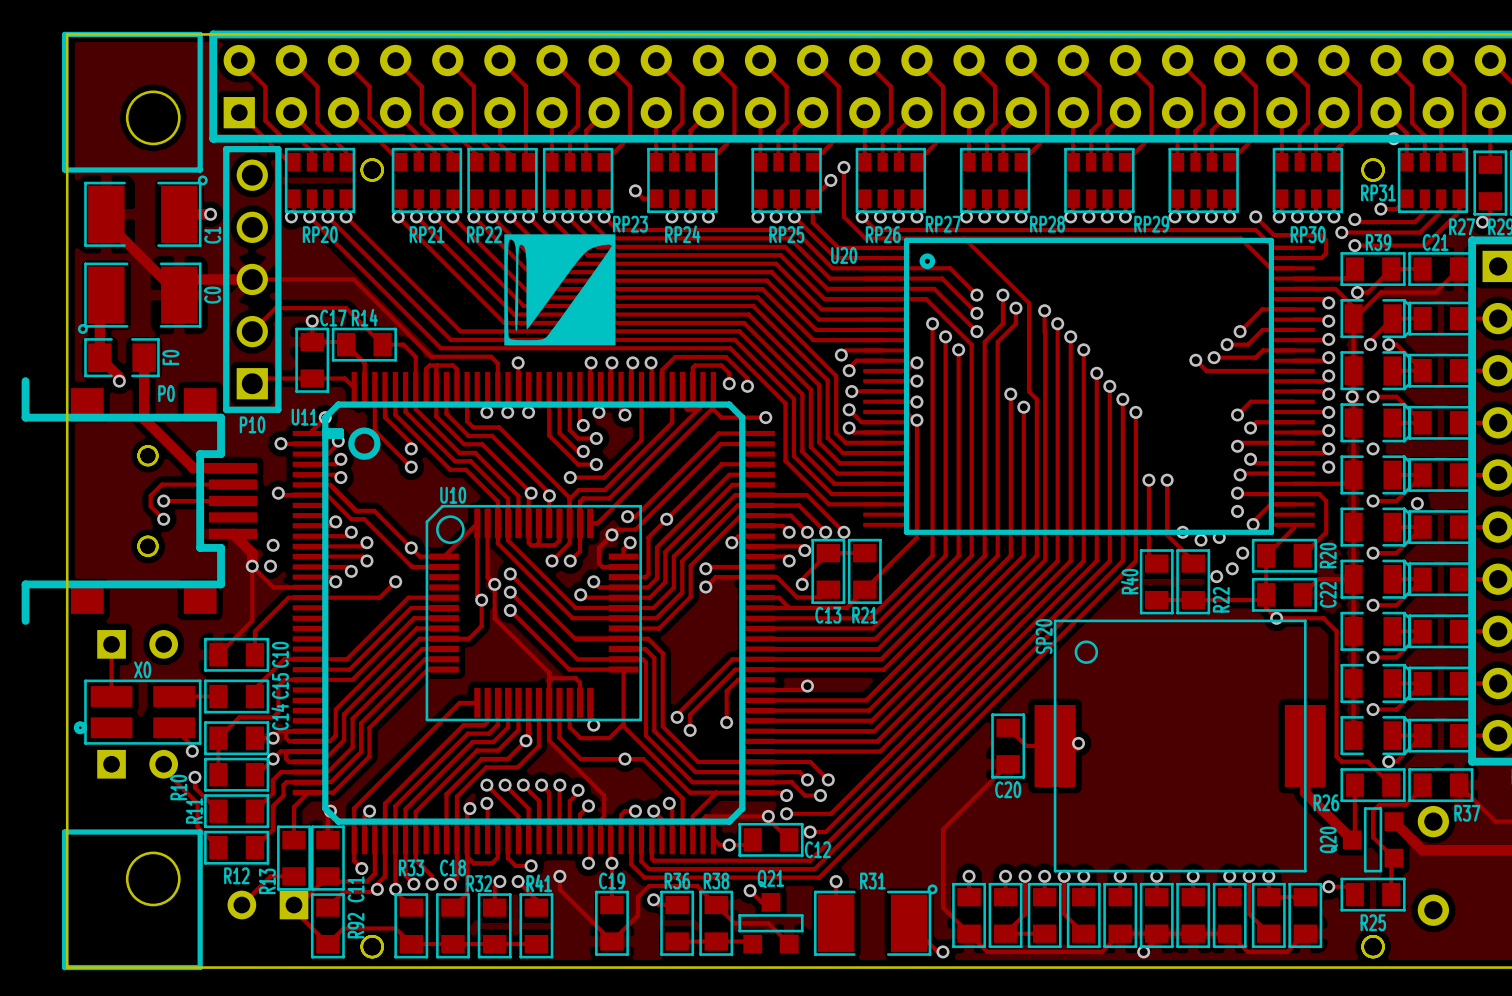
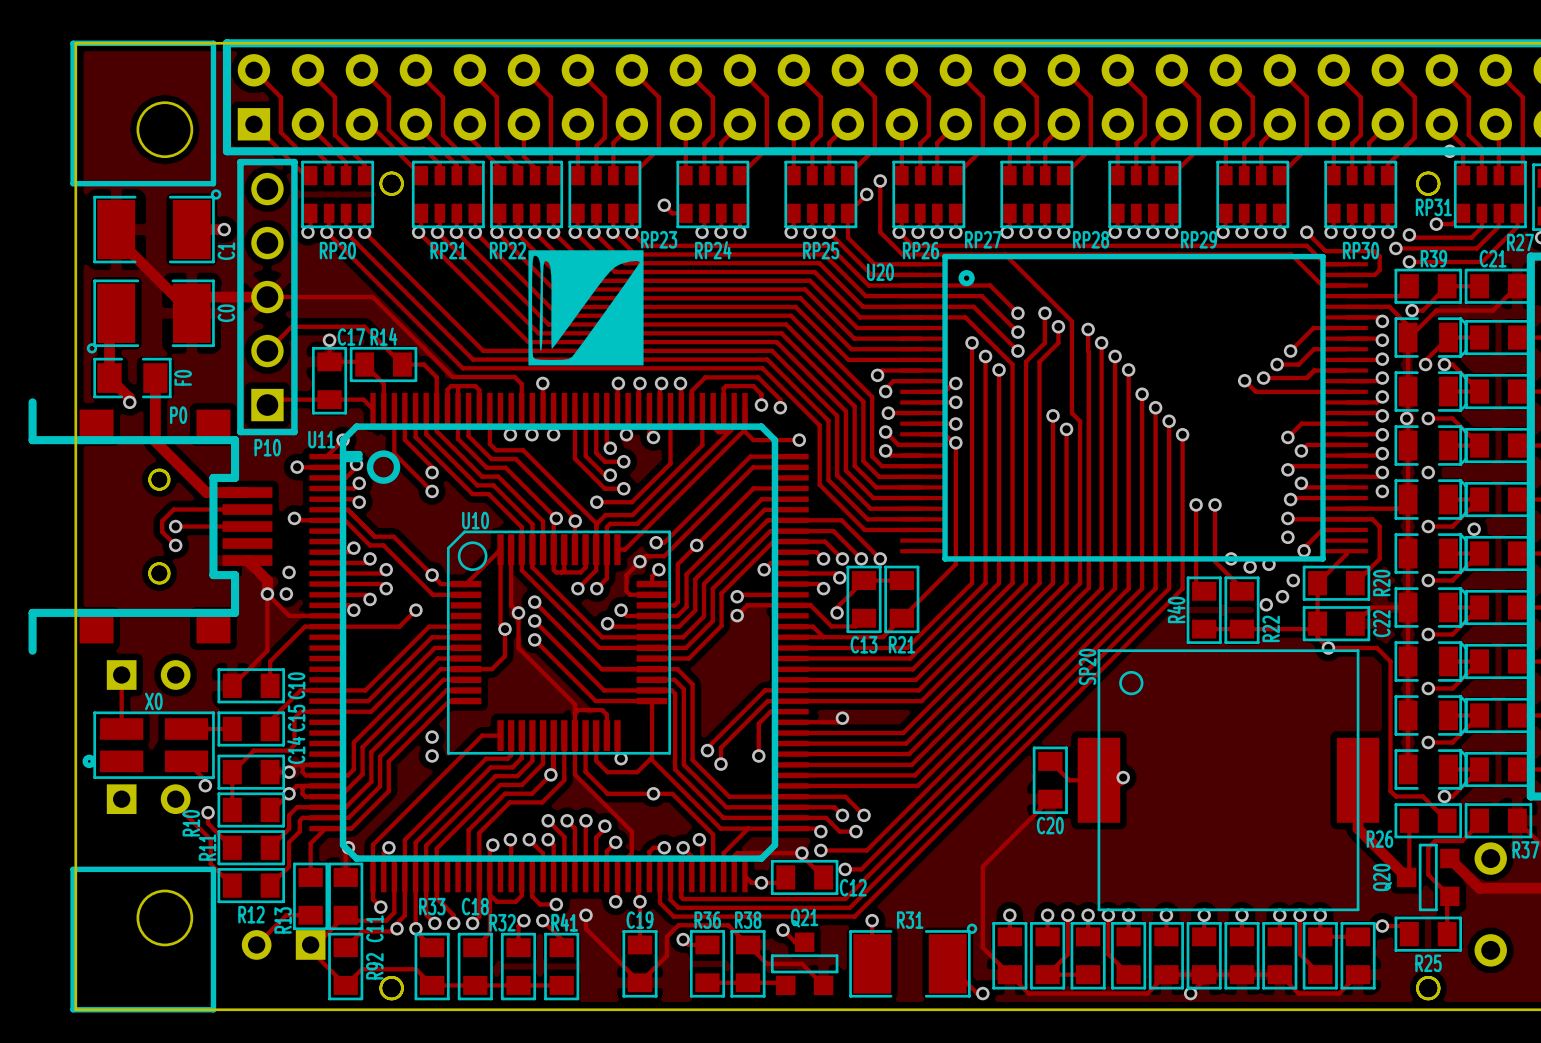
via: none -> (432, 737)
via: none -> (432, 755)
track: (486, 785) (505, 803) -> none
via: (486, 785) -> none
track: (505, 785) (523, 803) -> none
via: (505, 785) -> none
via: none -> (529, 839)
via: none -> (548, 839)

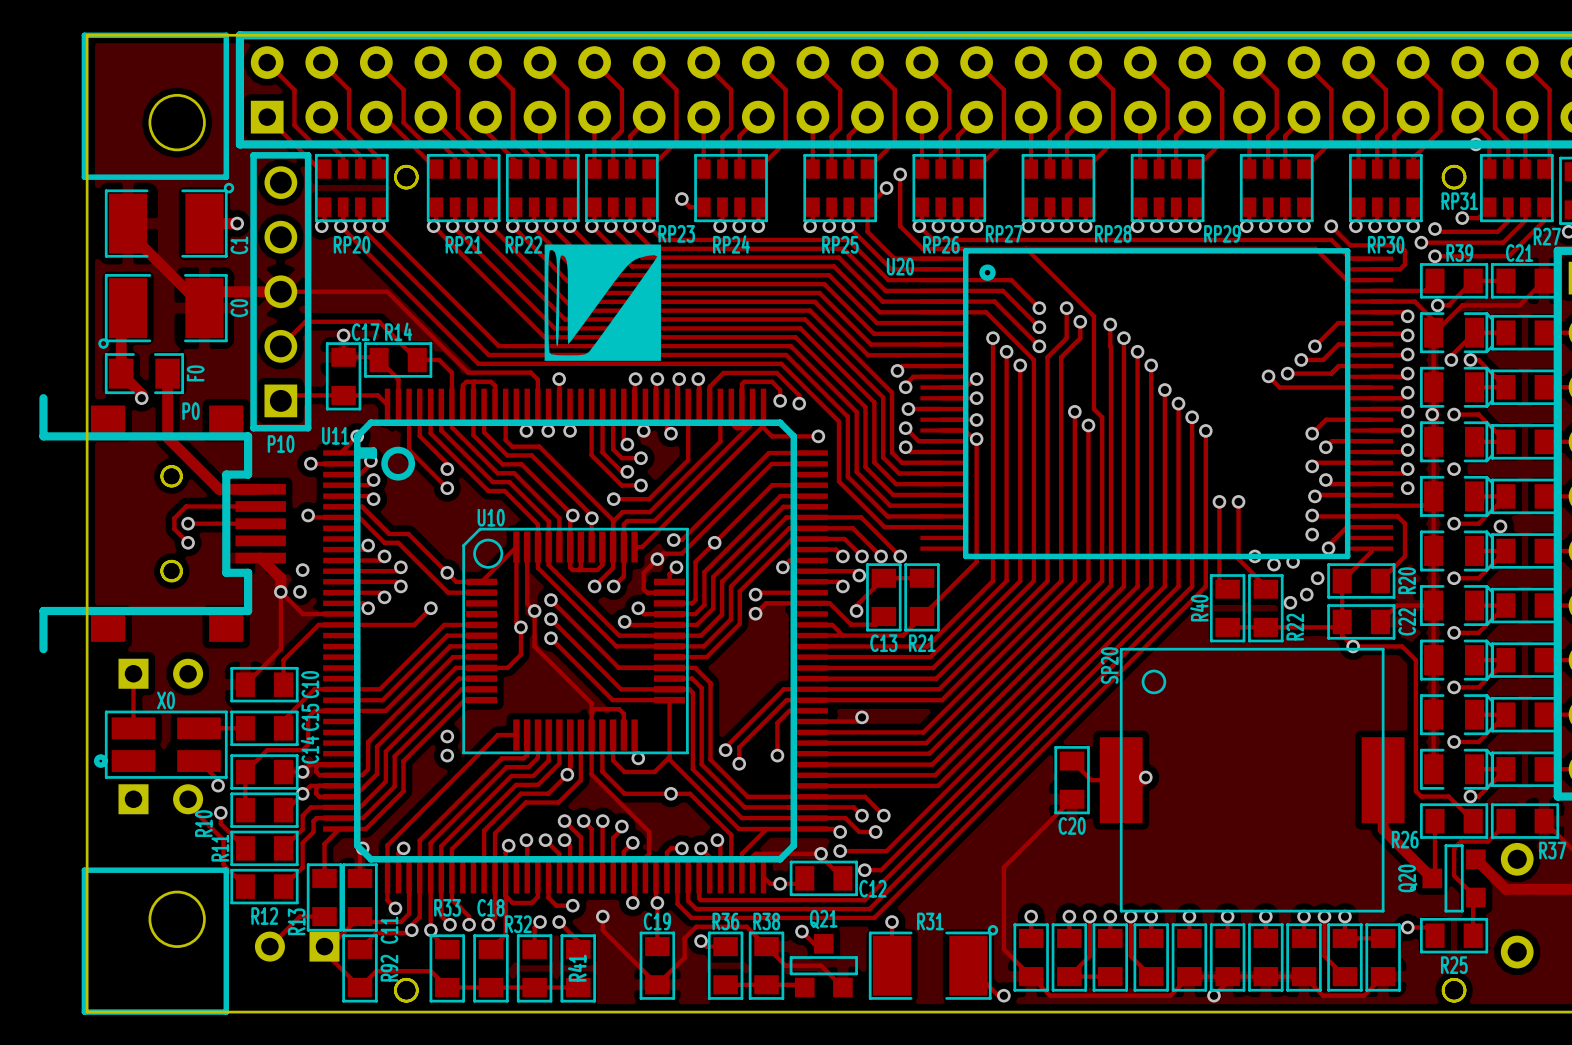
R41 name rotation: 0° (564, 922) -> 90° counterclockwise (577, 968)
R41 name position: R41 (564, 922) -> R41 (577, 968)

